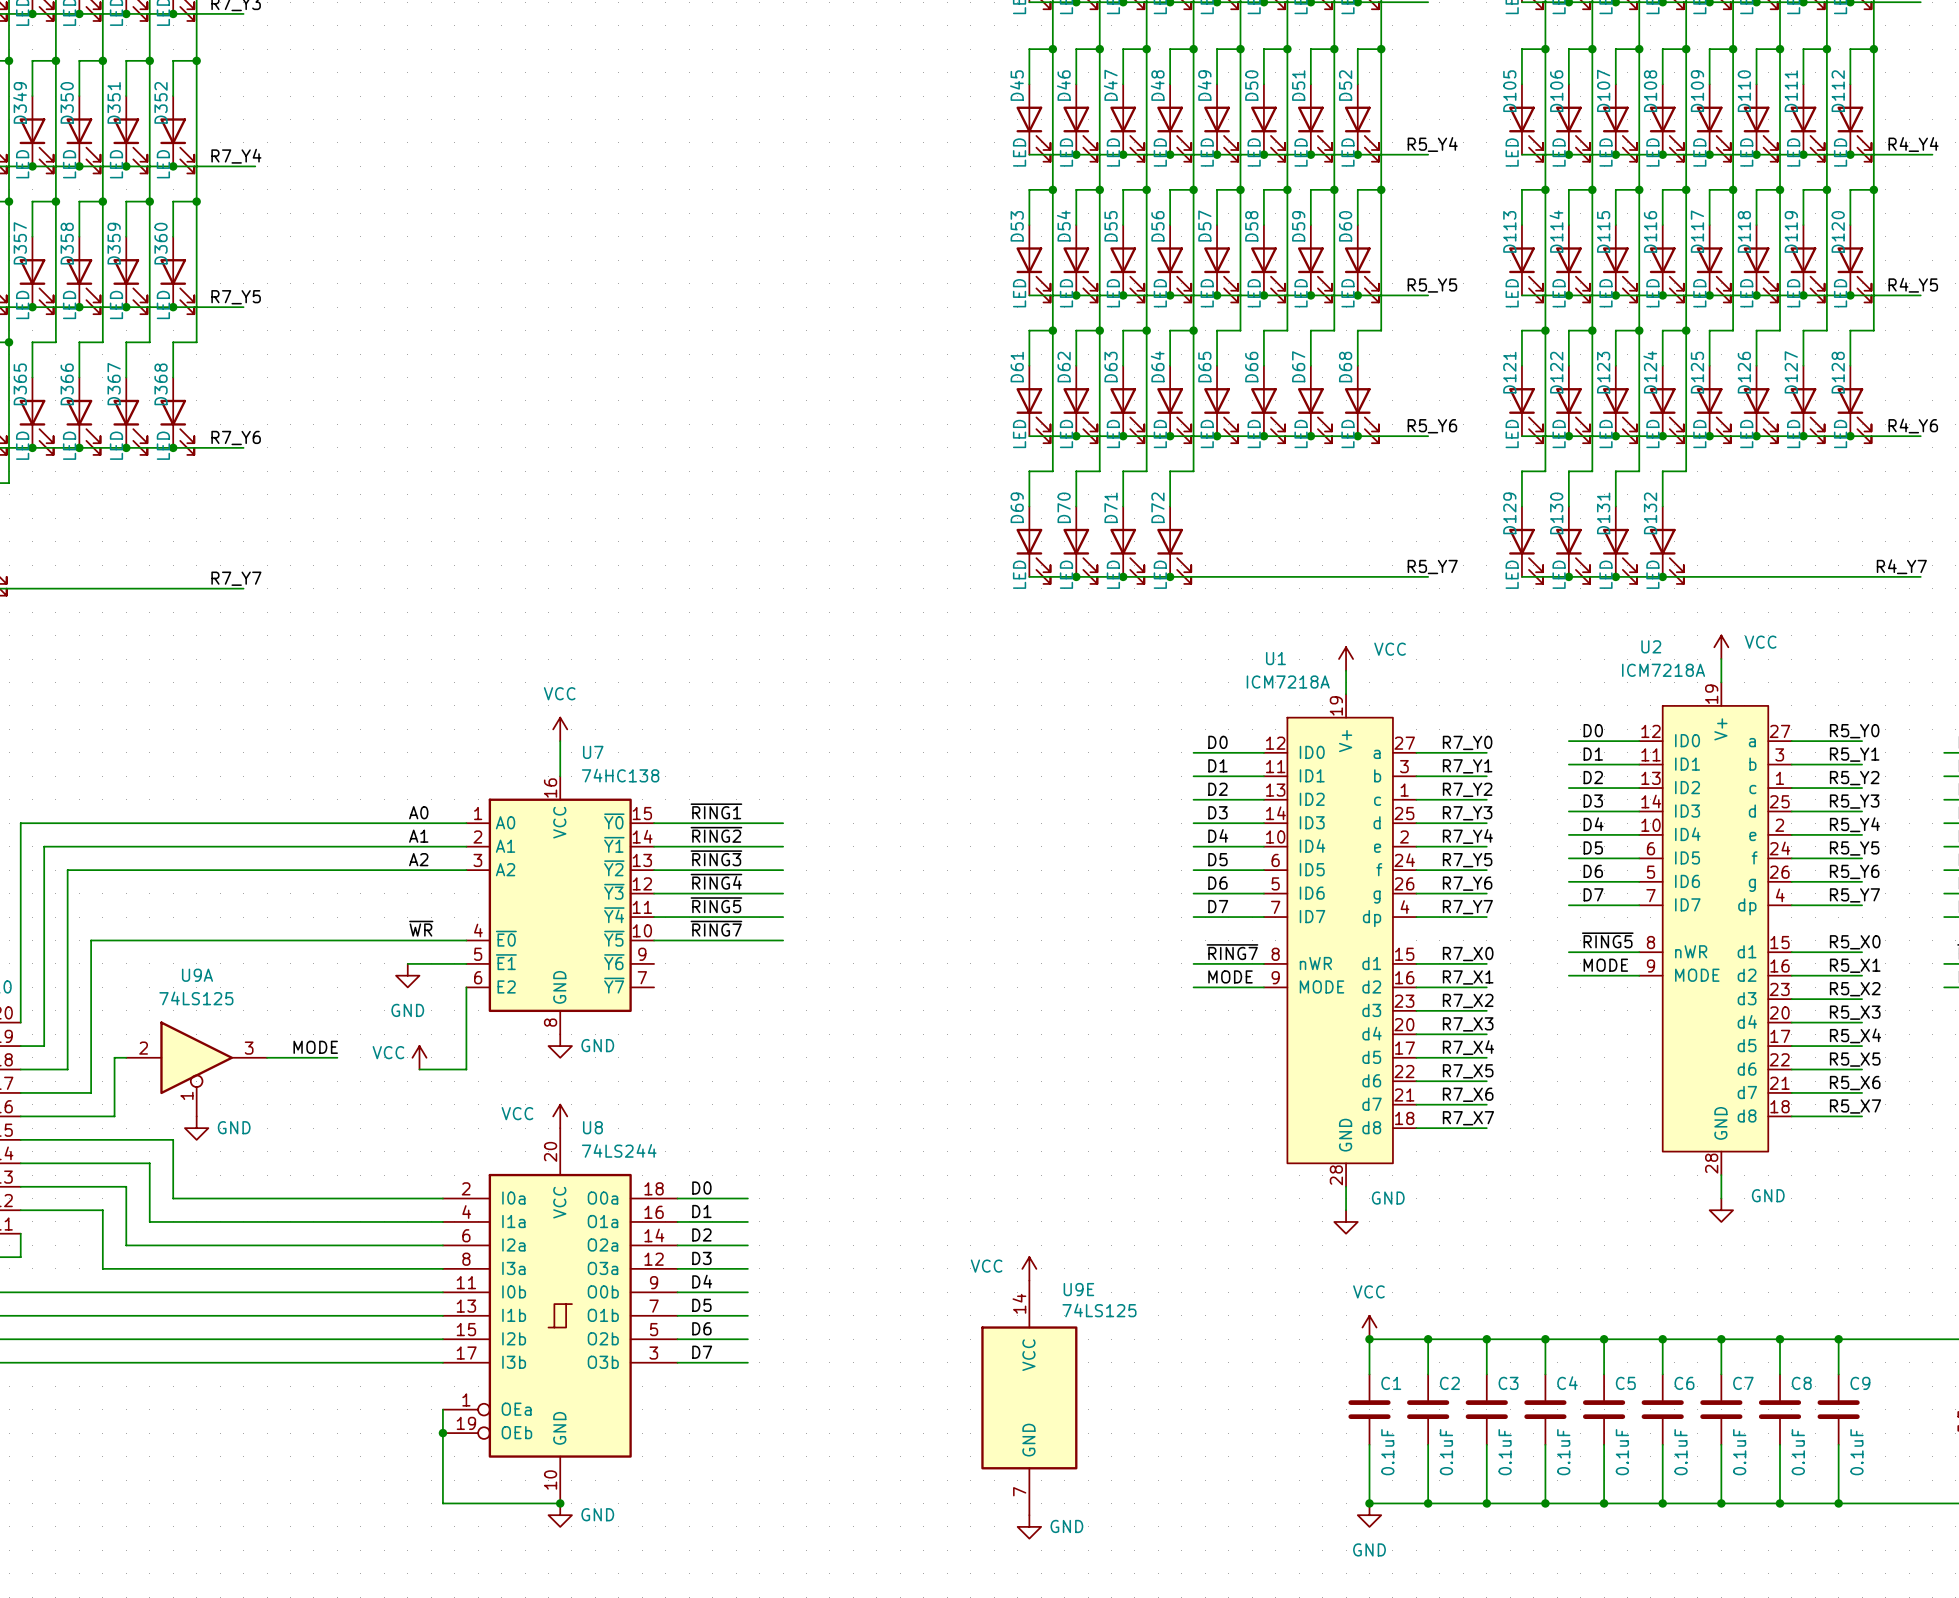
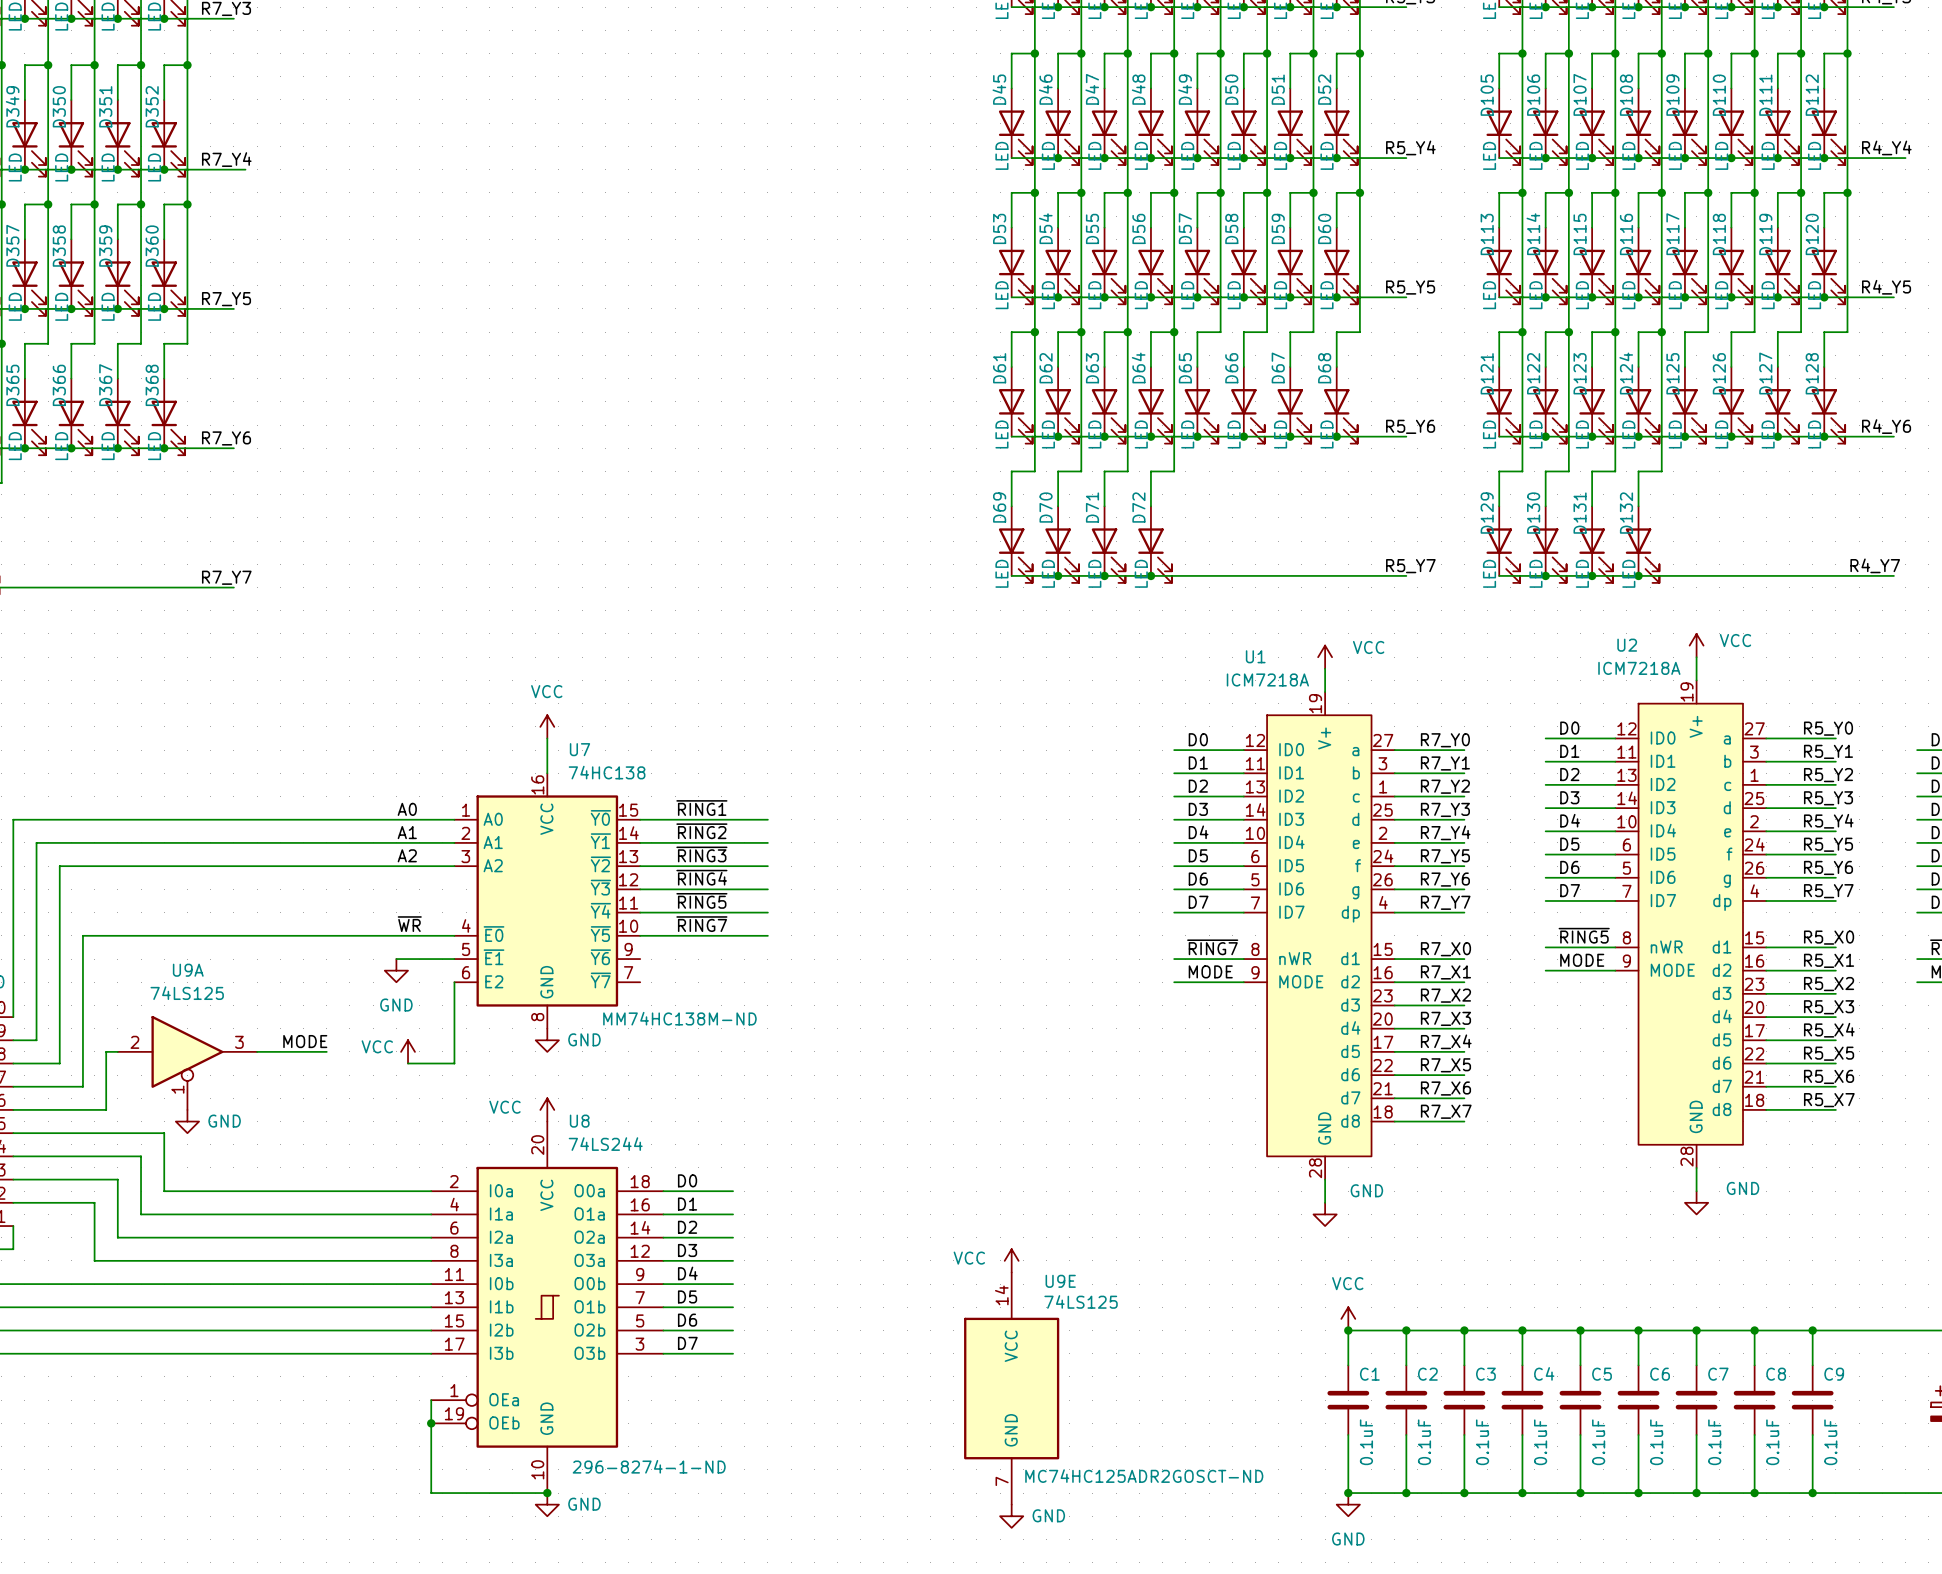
U7 text: none -> MM74HC138M-ND (679, 1018)
U8 text: none -> 296-8274-1-ND (649, 1466)
U9E text: none -> MC74HC125ADR2GOSCT-ND (1144, 1476)

